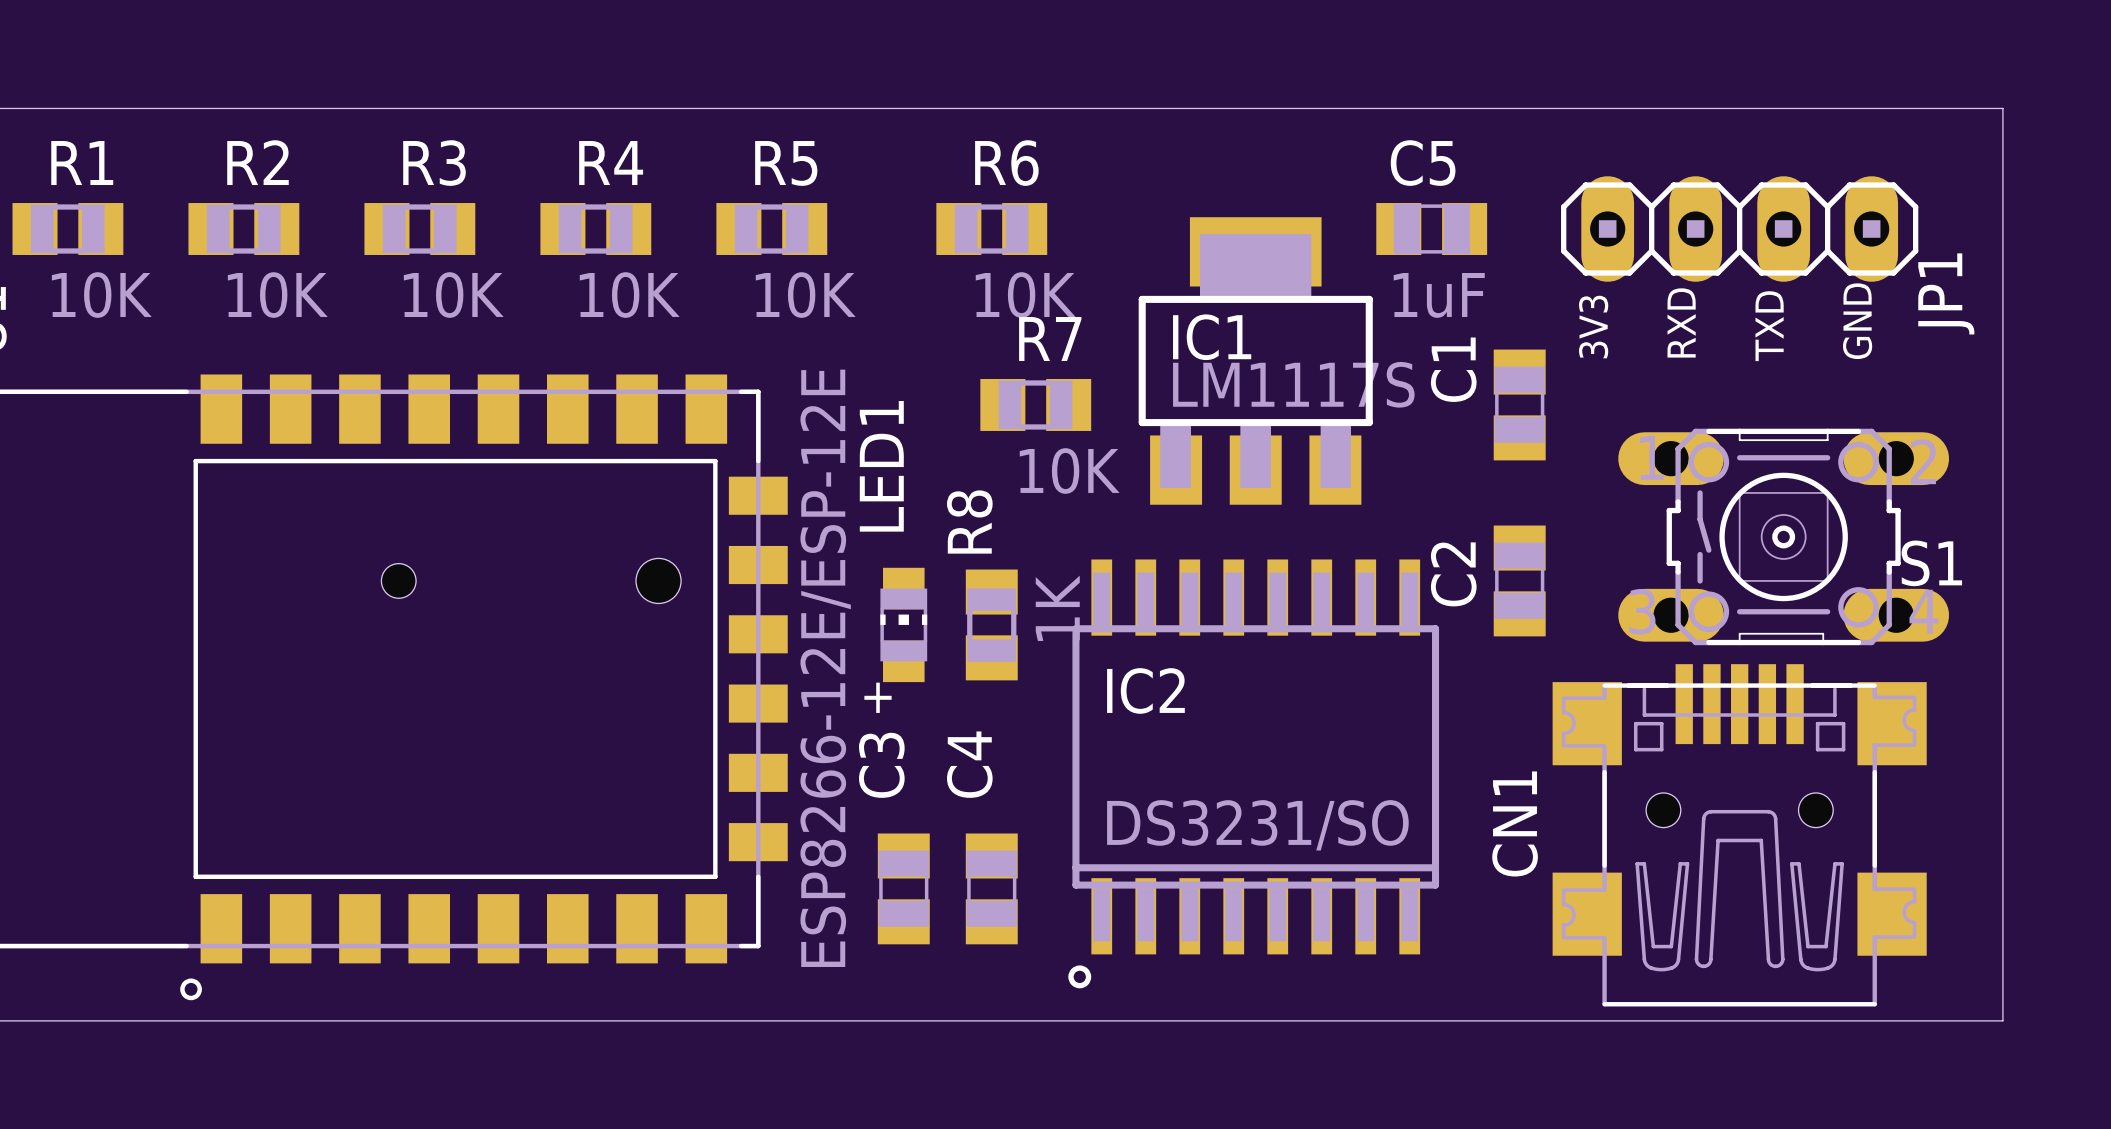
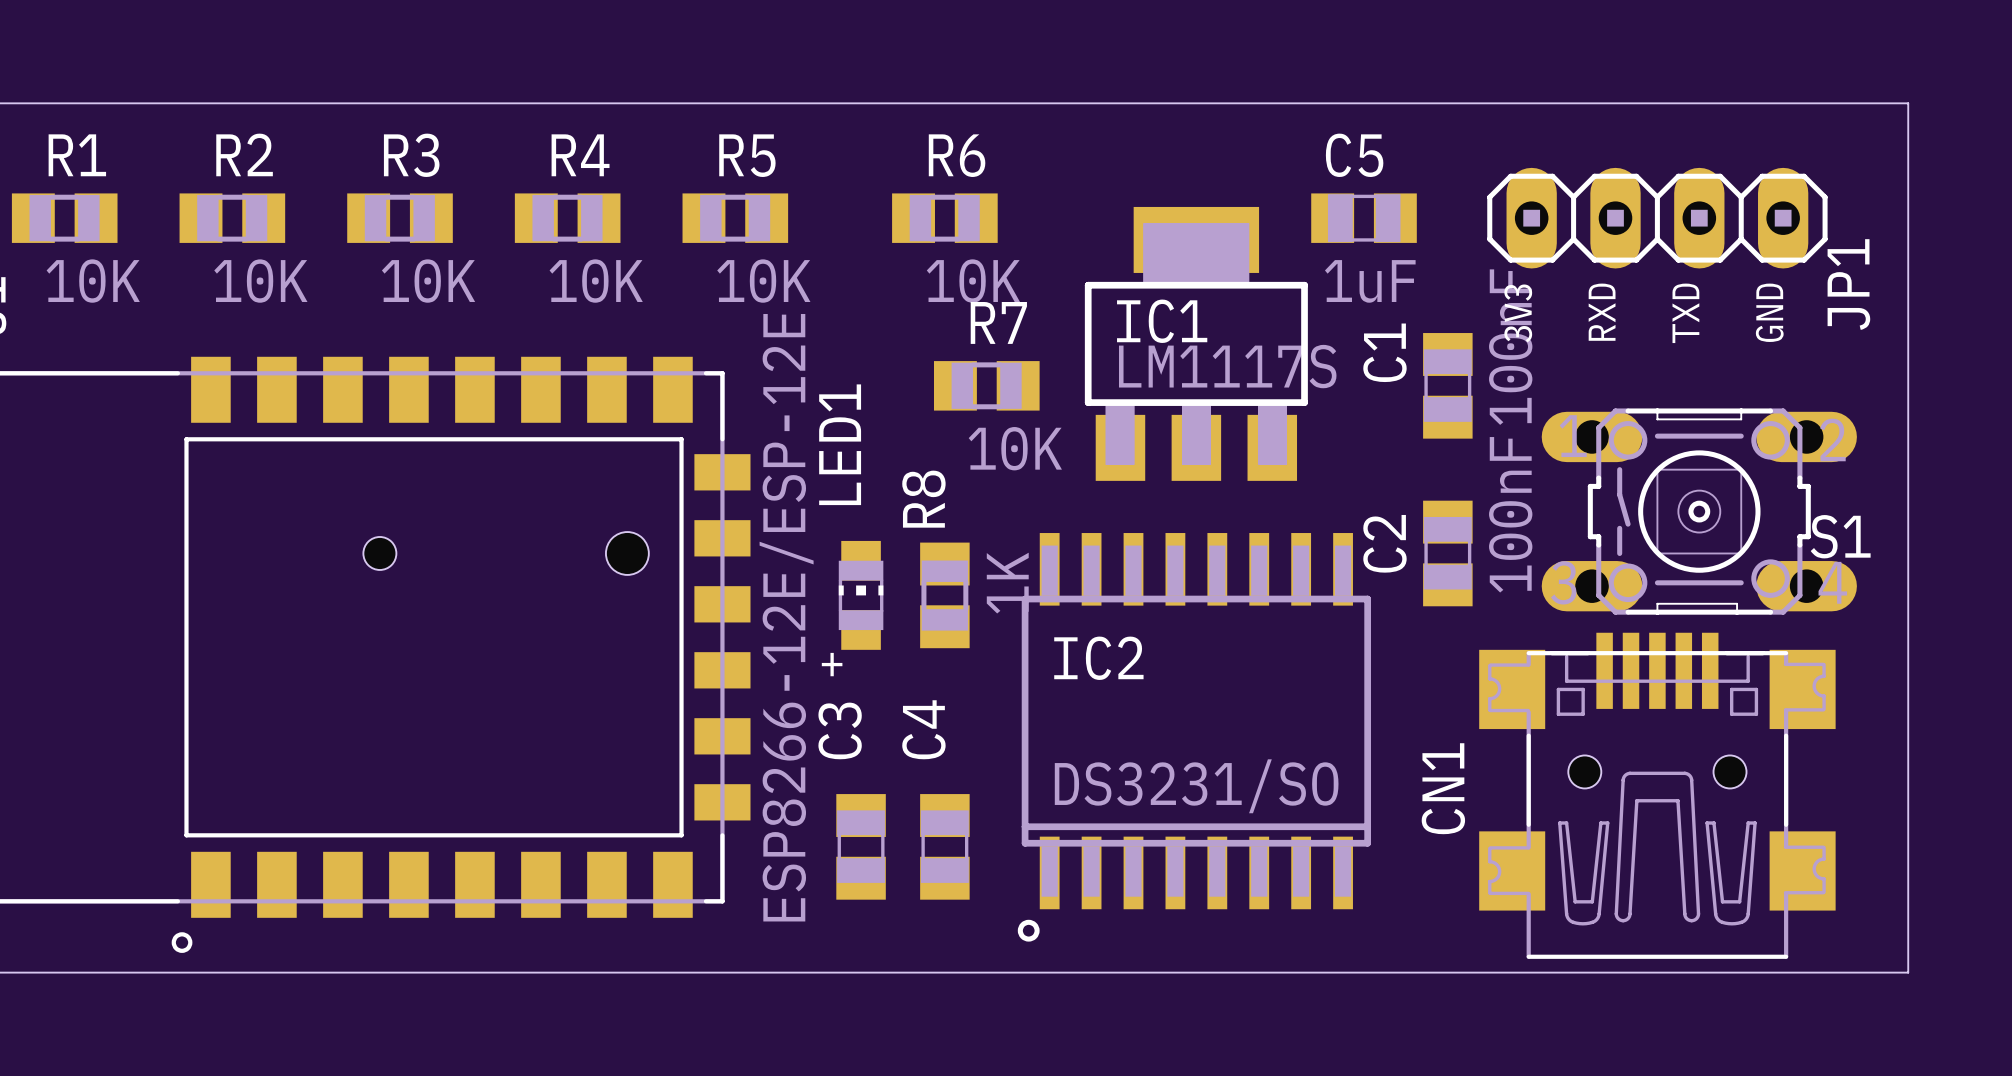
C1 value: none -> 100nF (1510, 347)
C2 value: none -> 100nF (1510, 514)

